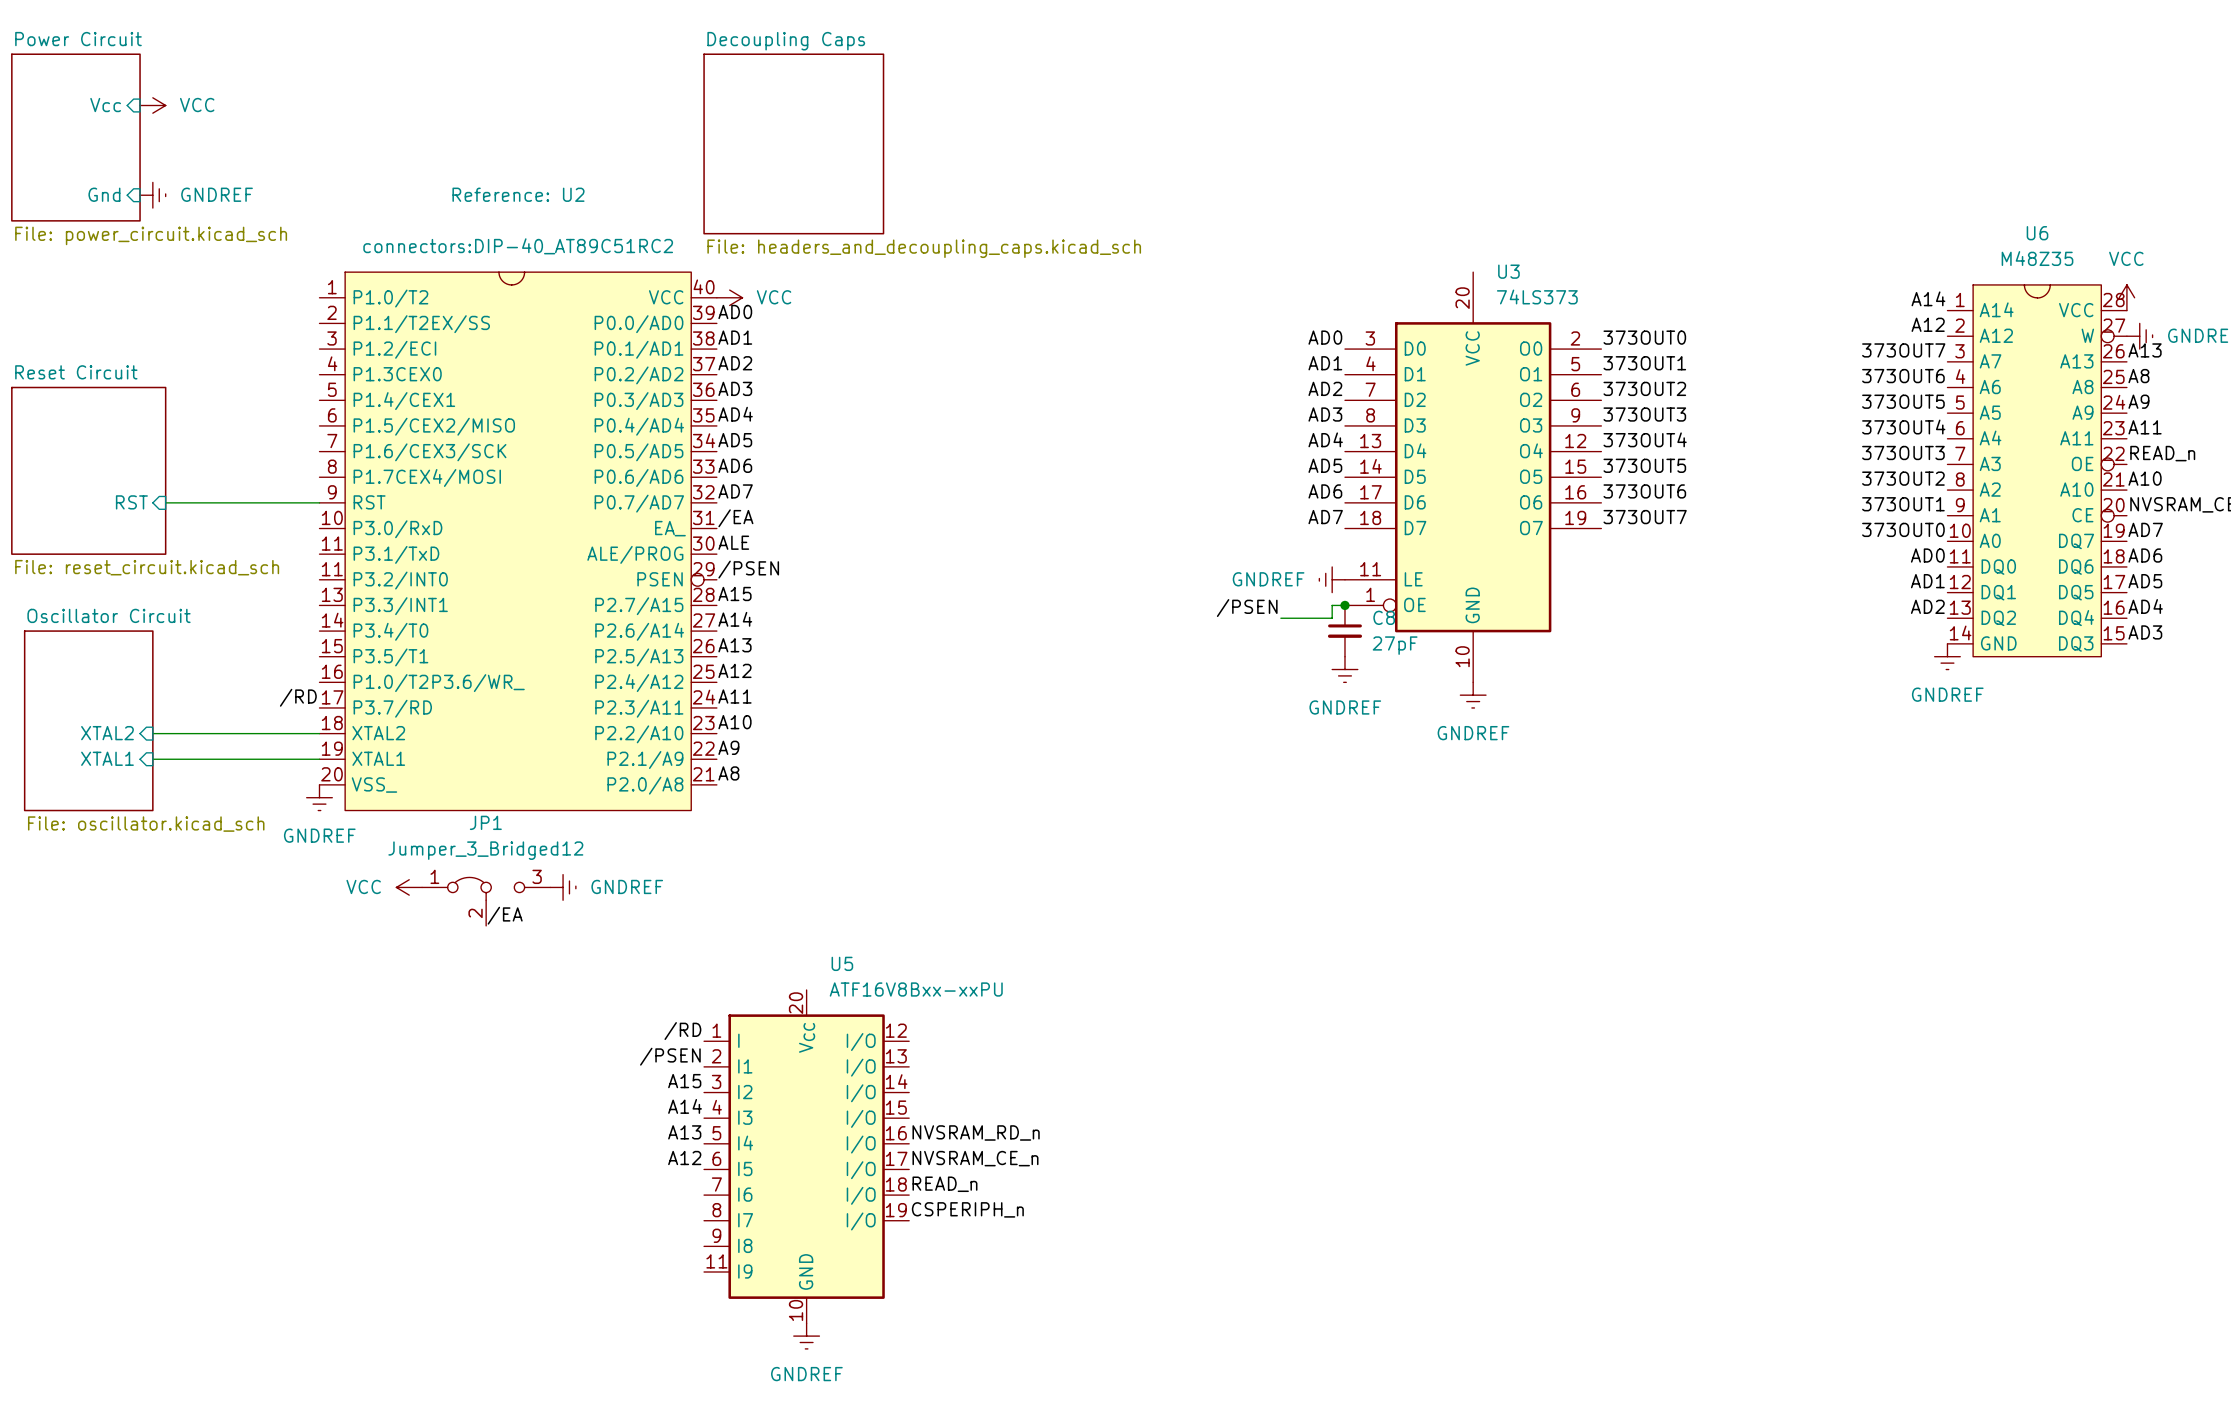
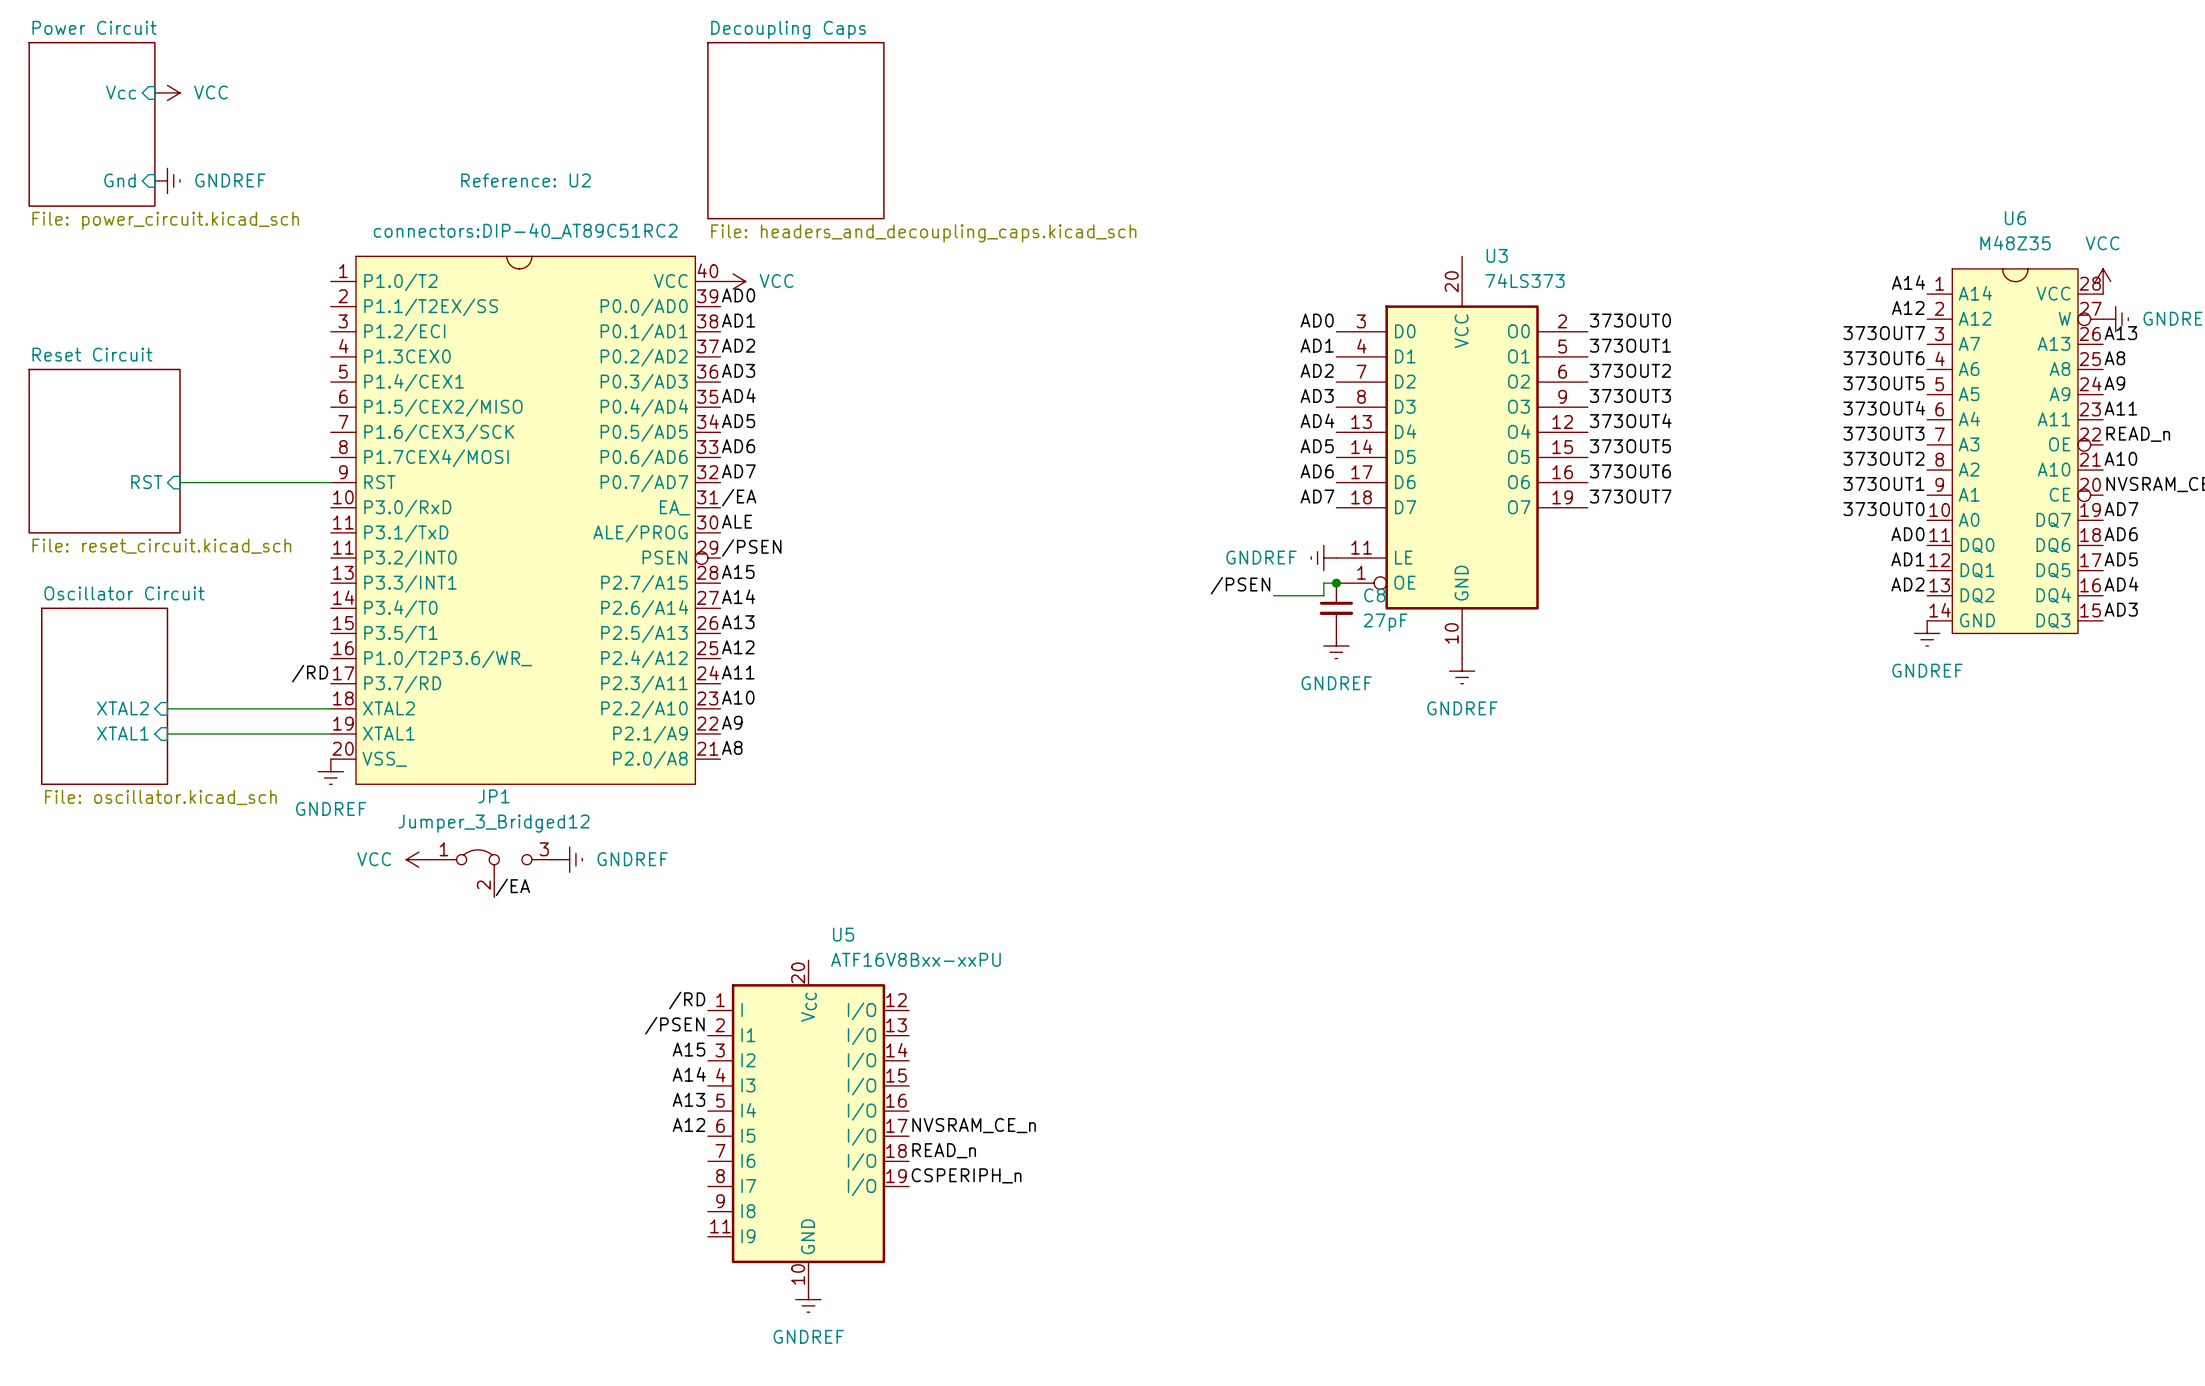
label: NVSRAM_RD_n (976, 1132) -> none

